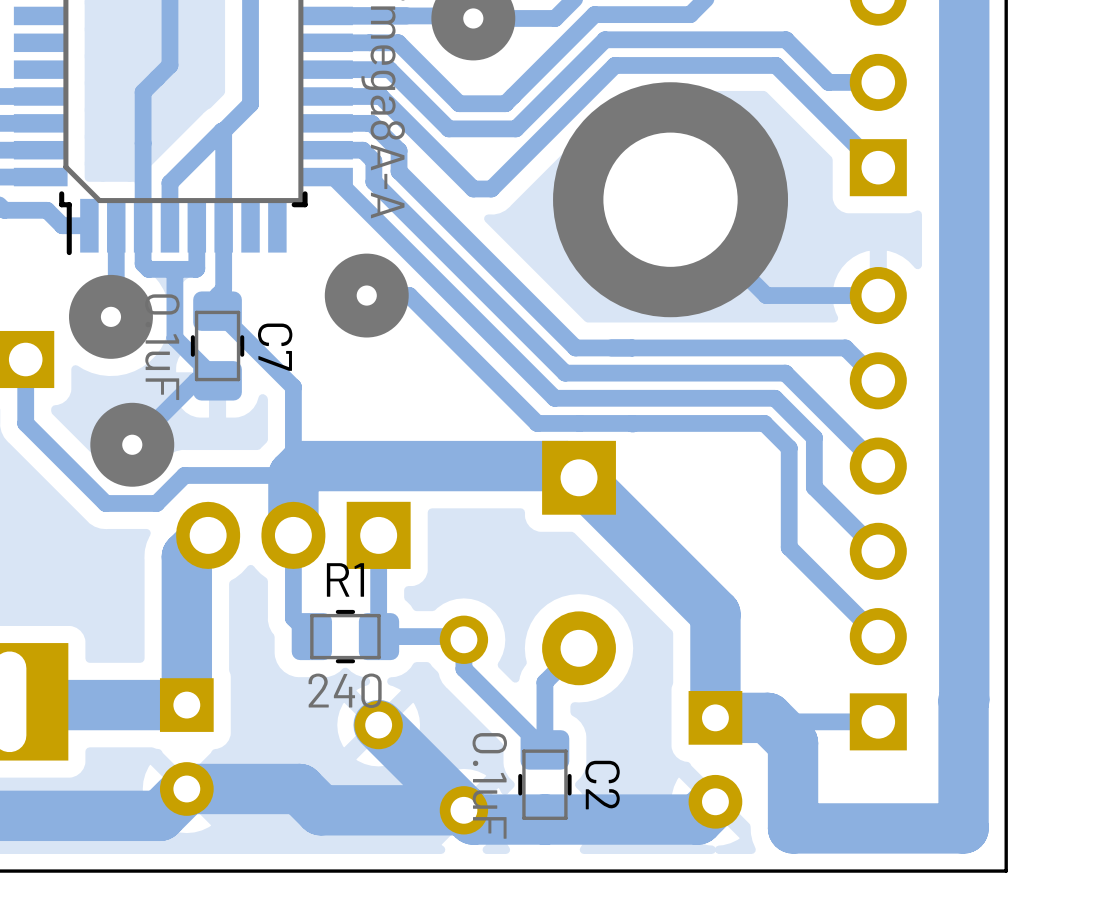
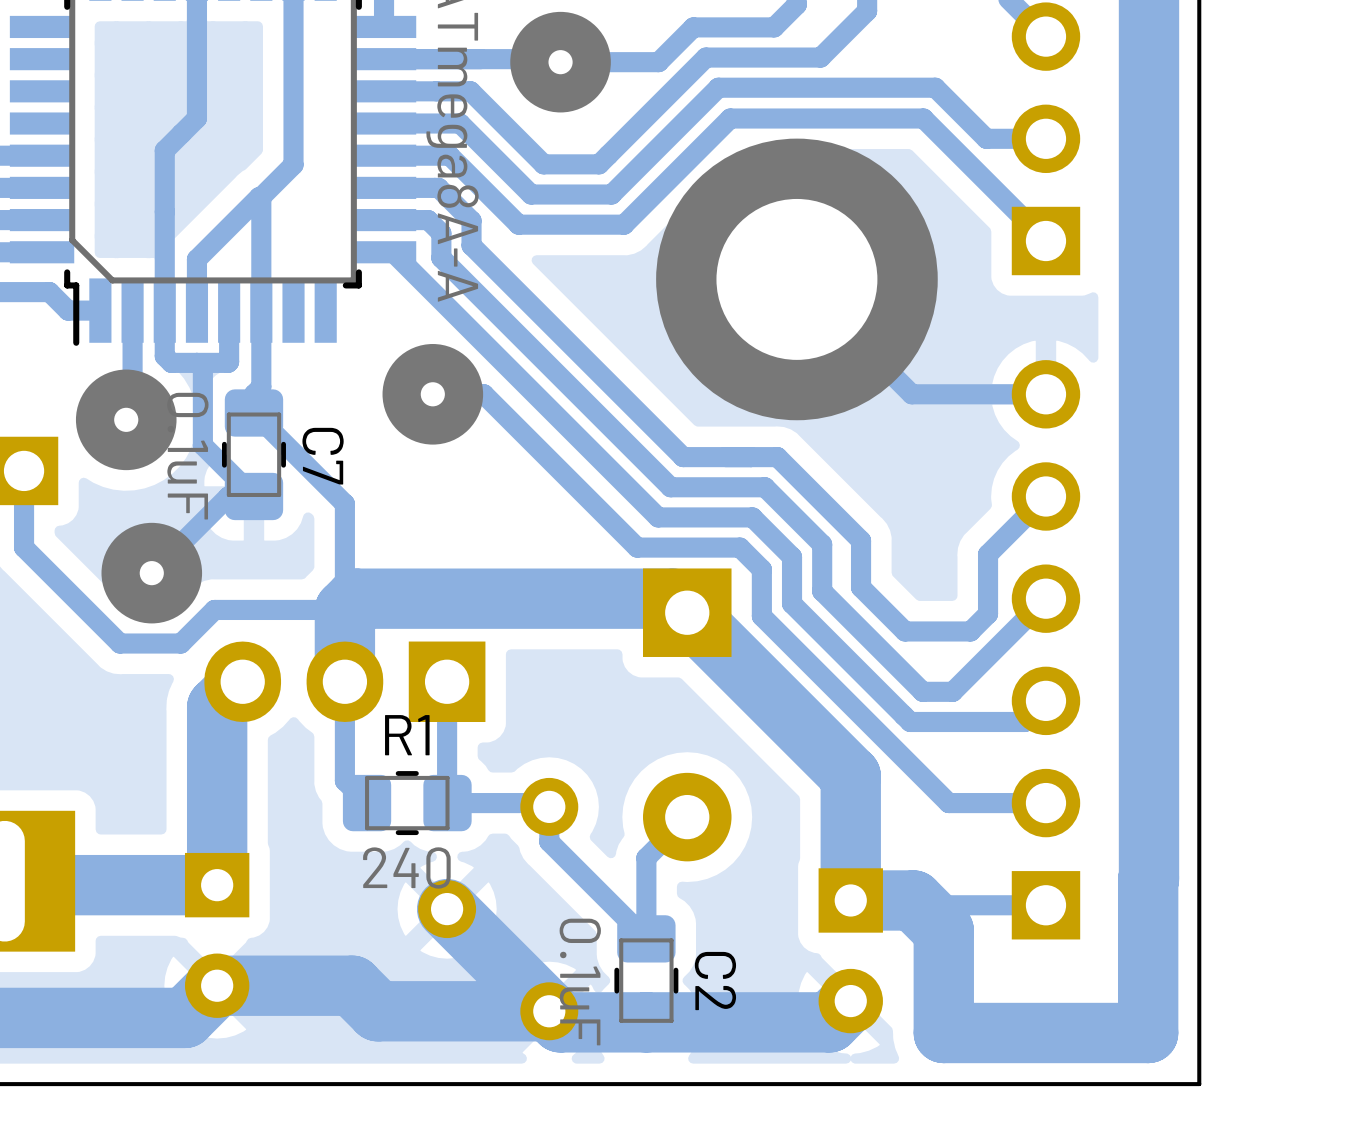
track: (526, 154) (491, 188) (473, 188) (438, 154) -> (624, 224) (518, 224)
track: (654, 347) (845, 347) (878, 380) -> (777, 457) (861, 540) (861, 587) (905, 631) (970, 631) (988, 613) (988, 554) (1045, 496)
track: (643, 373) (785, 373) (878, 466) -> (764, 487) (822, 544) (822, 591) (922, 691) (952, 691) (1045, 598)
track: (633, 398) (774, 398) (814, 437) (814, 487) (878, 551) -> (752, 517) (792, 556) (792, 603) (910, 721) (1024, 721) (1045, 700)
track: (623, 423) (764, 423) (789, 448) (789, 547) (878, 636) -> (740, 547) (761, 569) (761, 616) (948, 803) (1045, 803)

